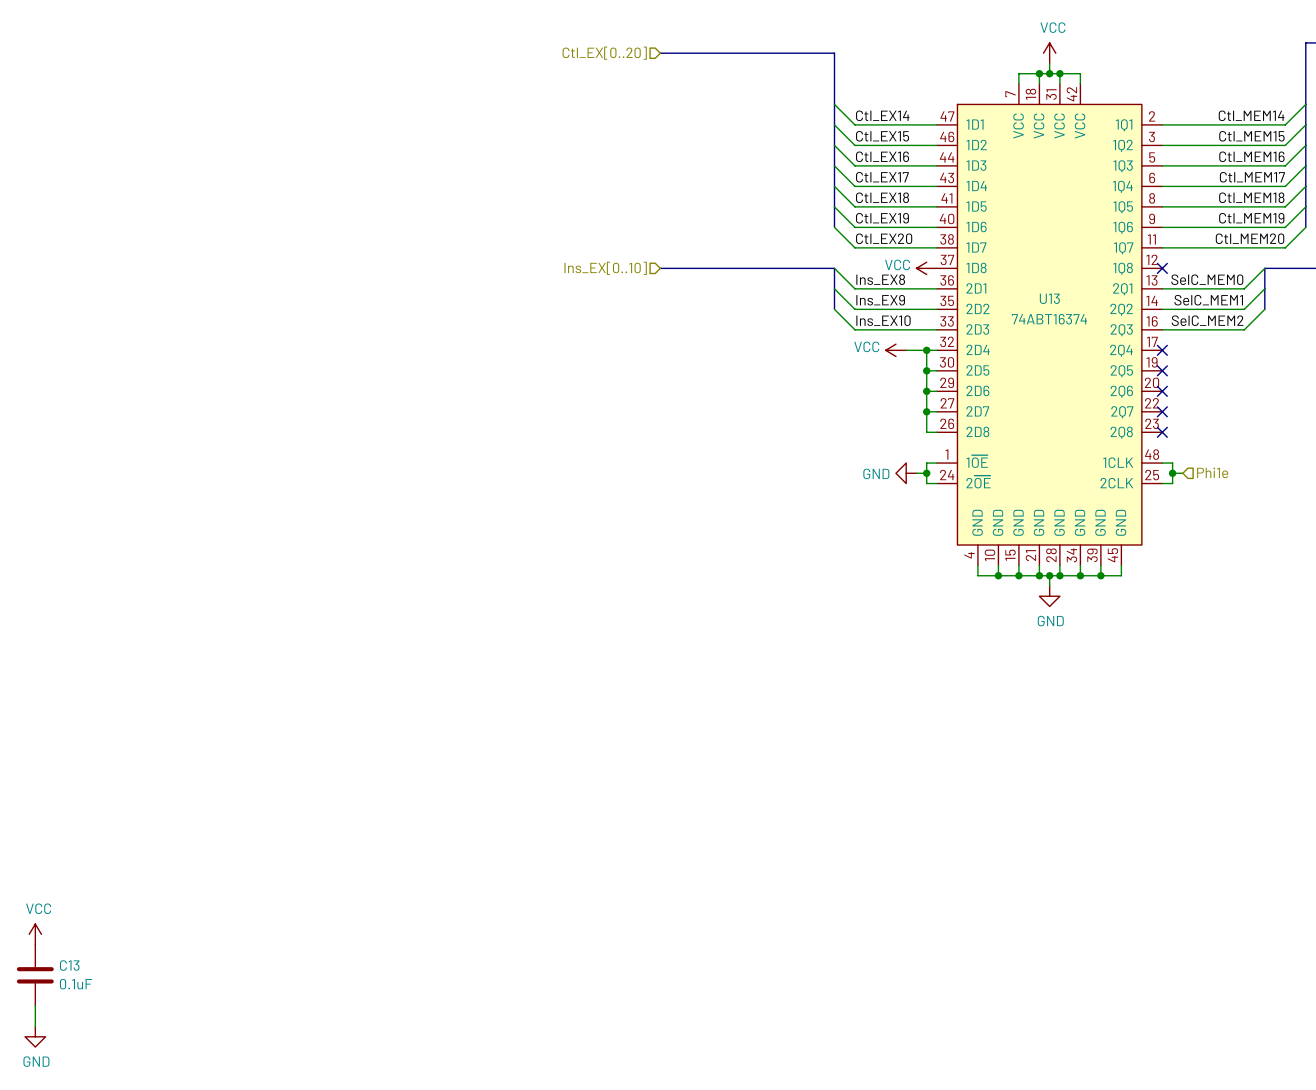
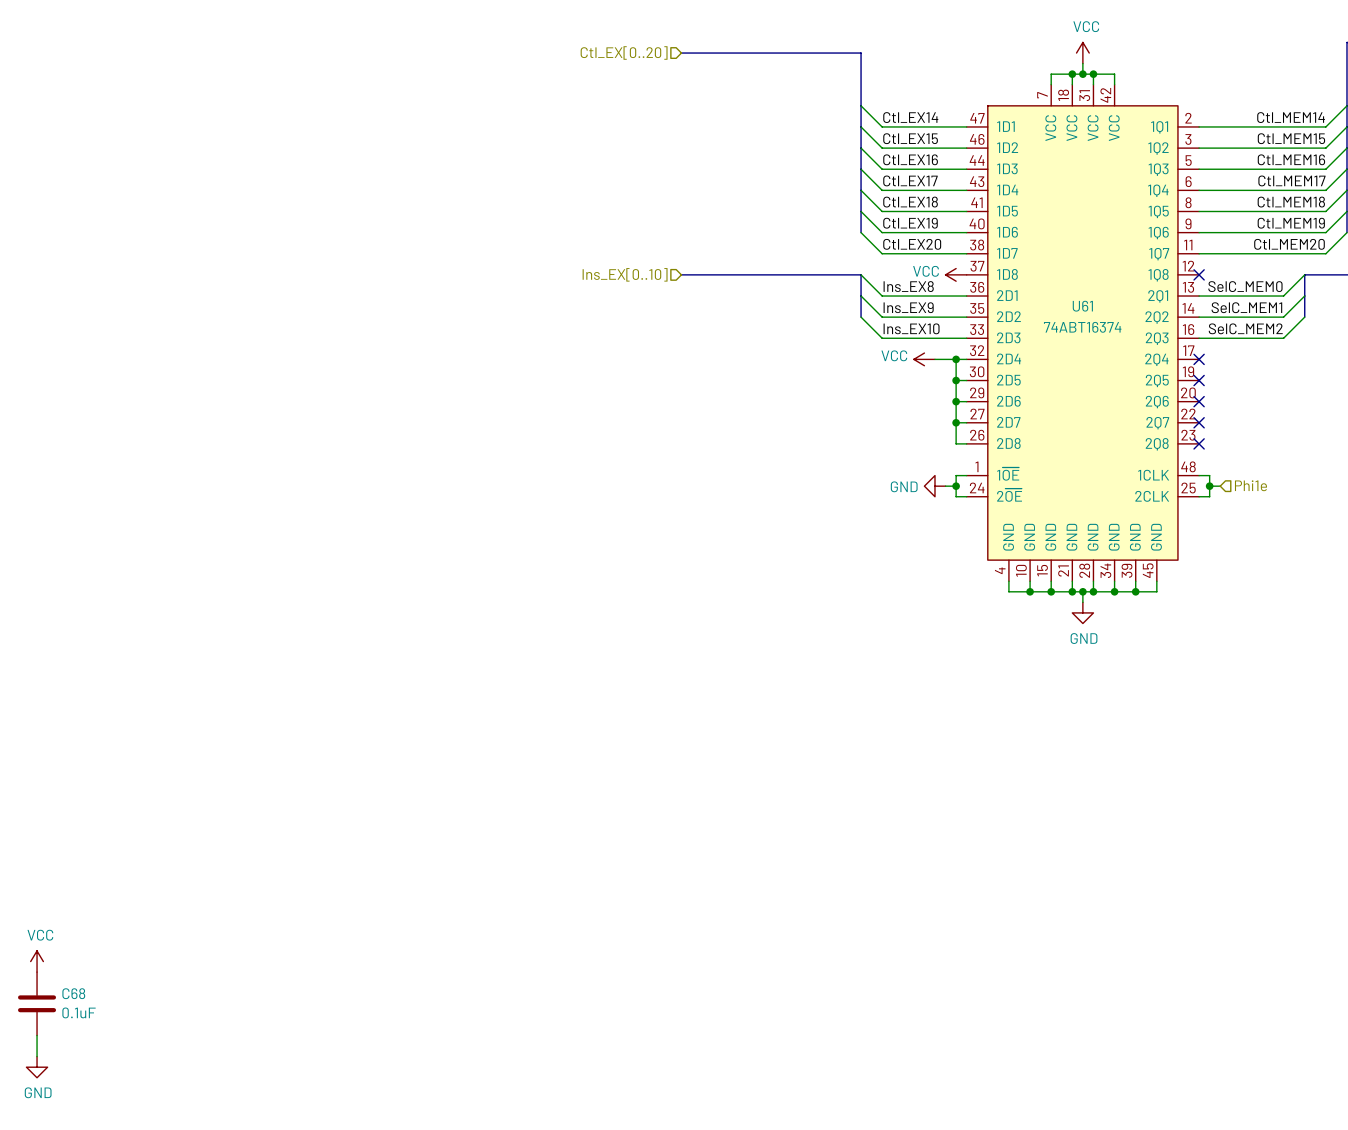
U13 name: U13 (1049, 298) -> U61 (1082, 306)
C13 name: C13 (69, 965) -> C68 (73, 993)

